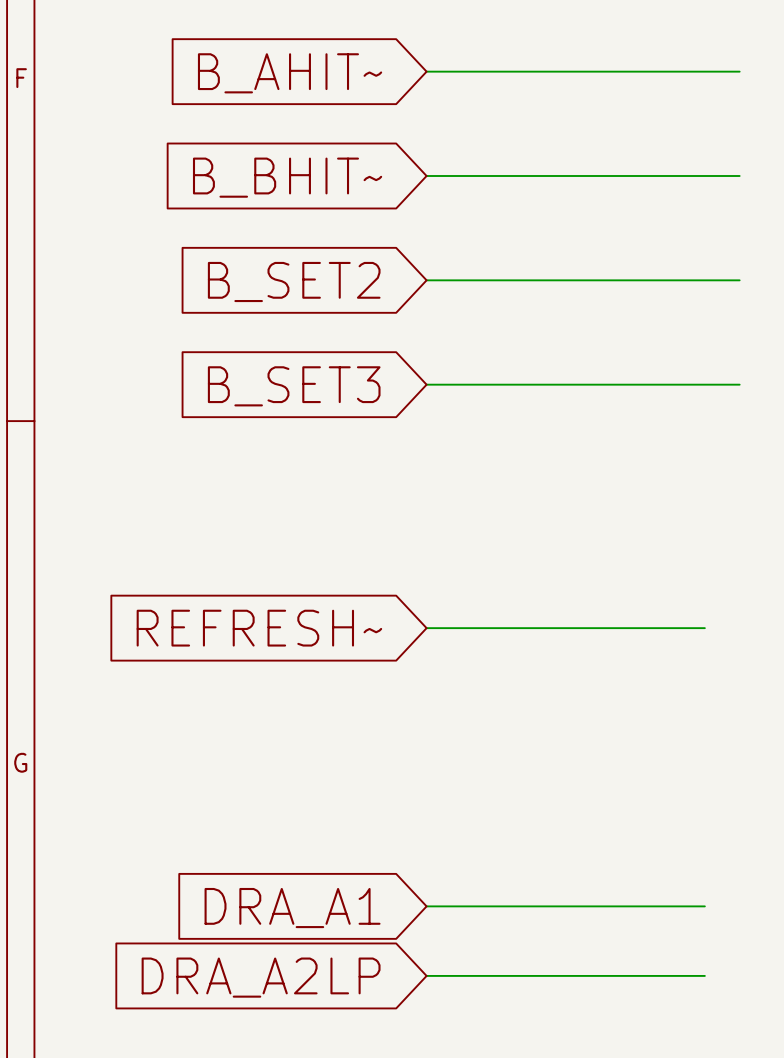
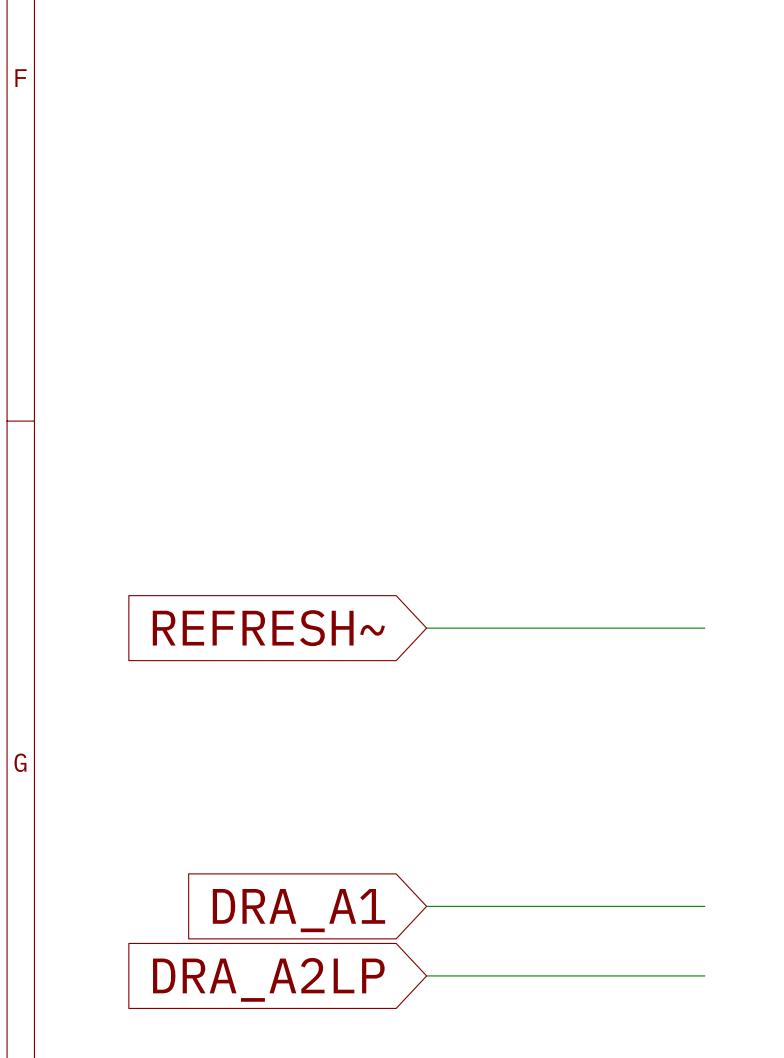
wire: (426, 71) (739, 71) -> none
global label: B_AHIT~ (290, 73) -> none
wire: (426, 175) (739, 175) -> none
global label: B_BHIT~ (287, 177) -> none
wire: (426, 280) (739, 280) -> none
global label: B_SET2 (294, 281) -> none
wire: (426, 384) (739, 384) -> none
global label: B_SET3 (294, 386) -> none

